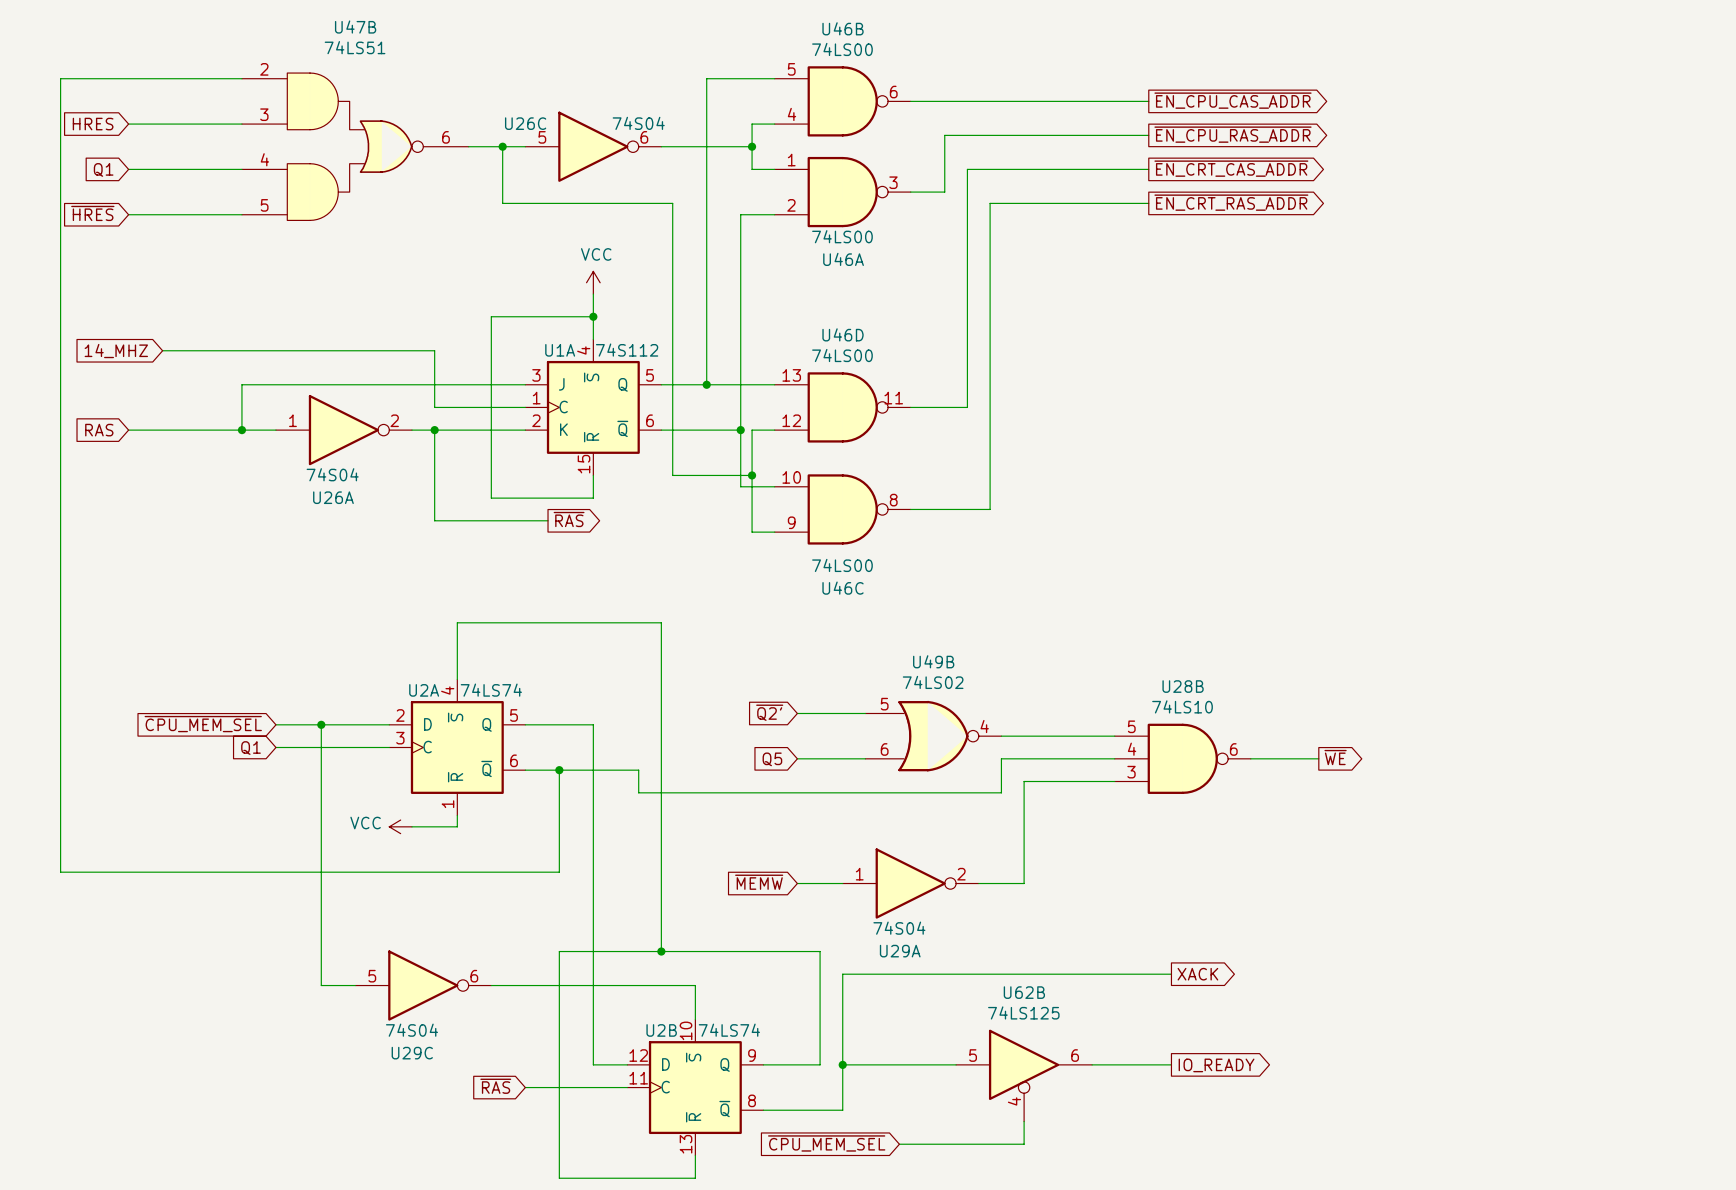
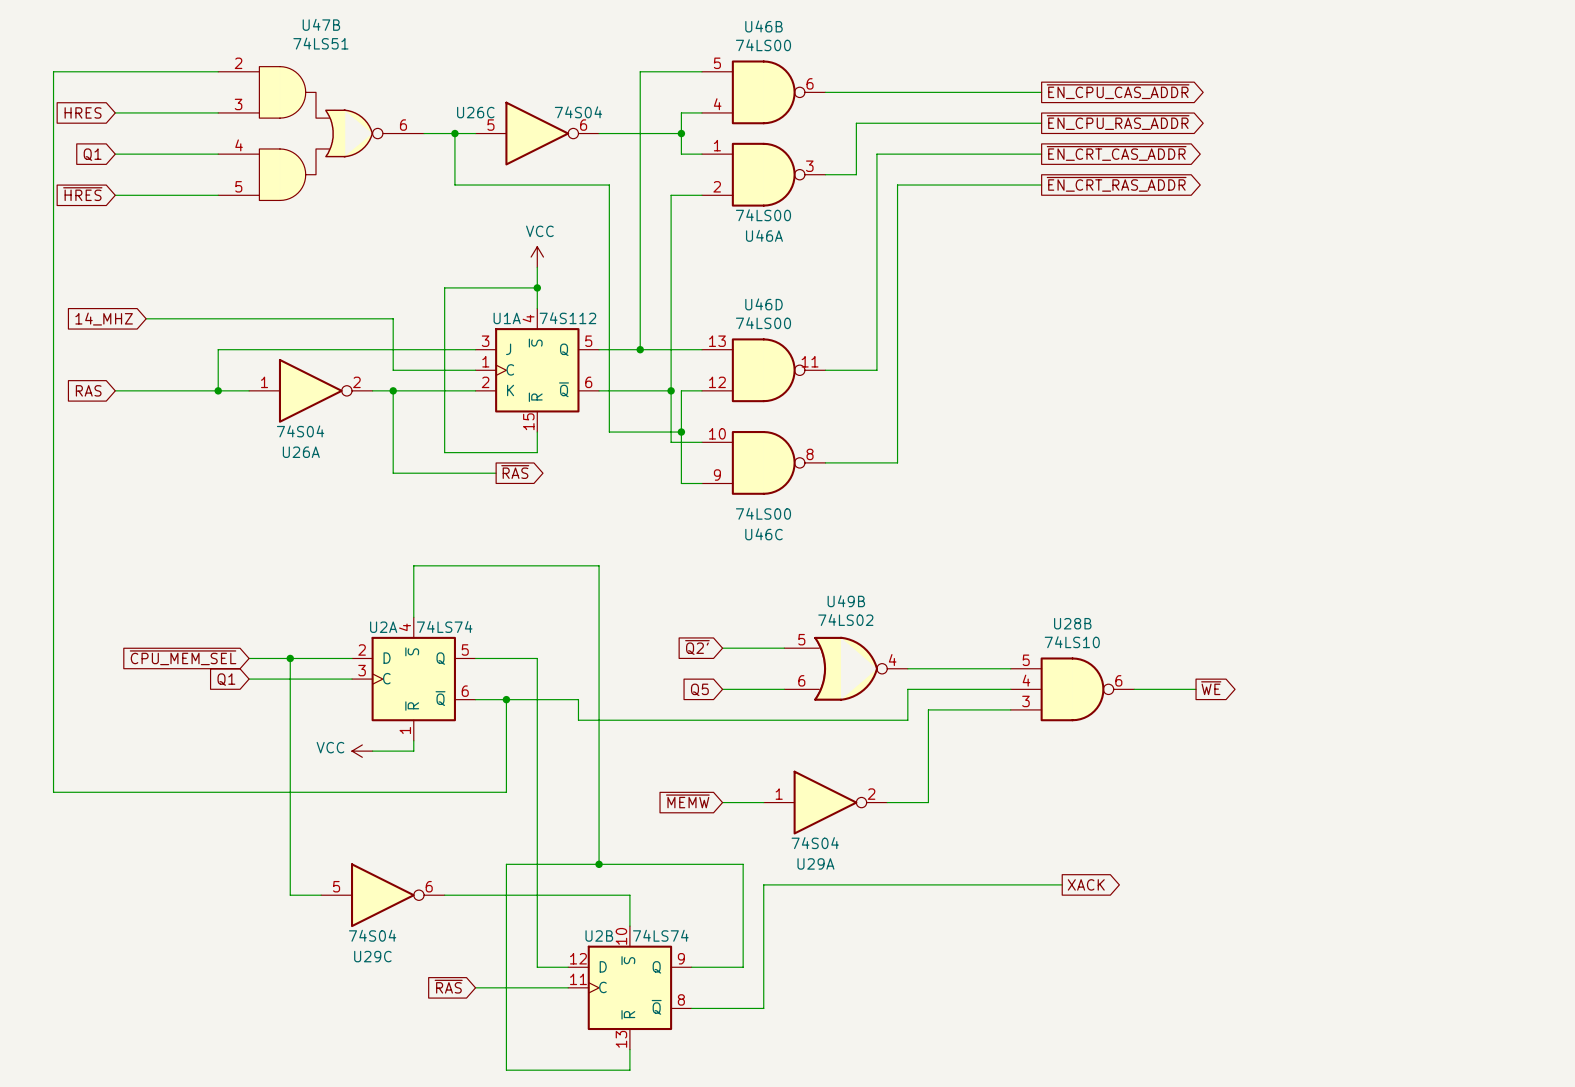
wire: (842, 1064) (956, 1064) -> none
junction: (842, 1064) -> none
wire: (1092, 1064) (1171, 1064) -> none
global label: IO_READY (1216, 1065) -> none
U62B: 74LS125 (1024, 1075) -> none
wire: (1024, 1121) (1024, 1144) (899, 1144) -> none
global label: ~{CPU_MEM_SEL} (826, 1143) -> none

